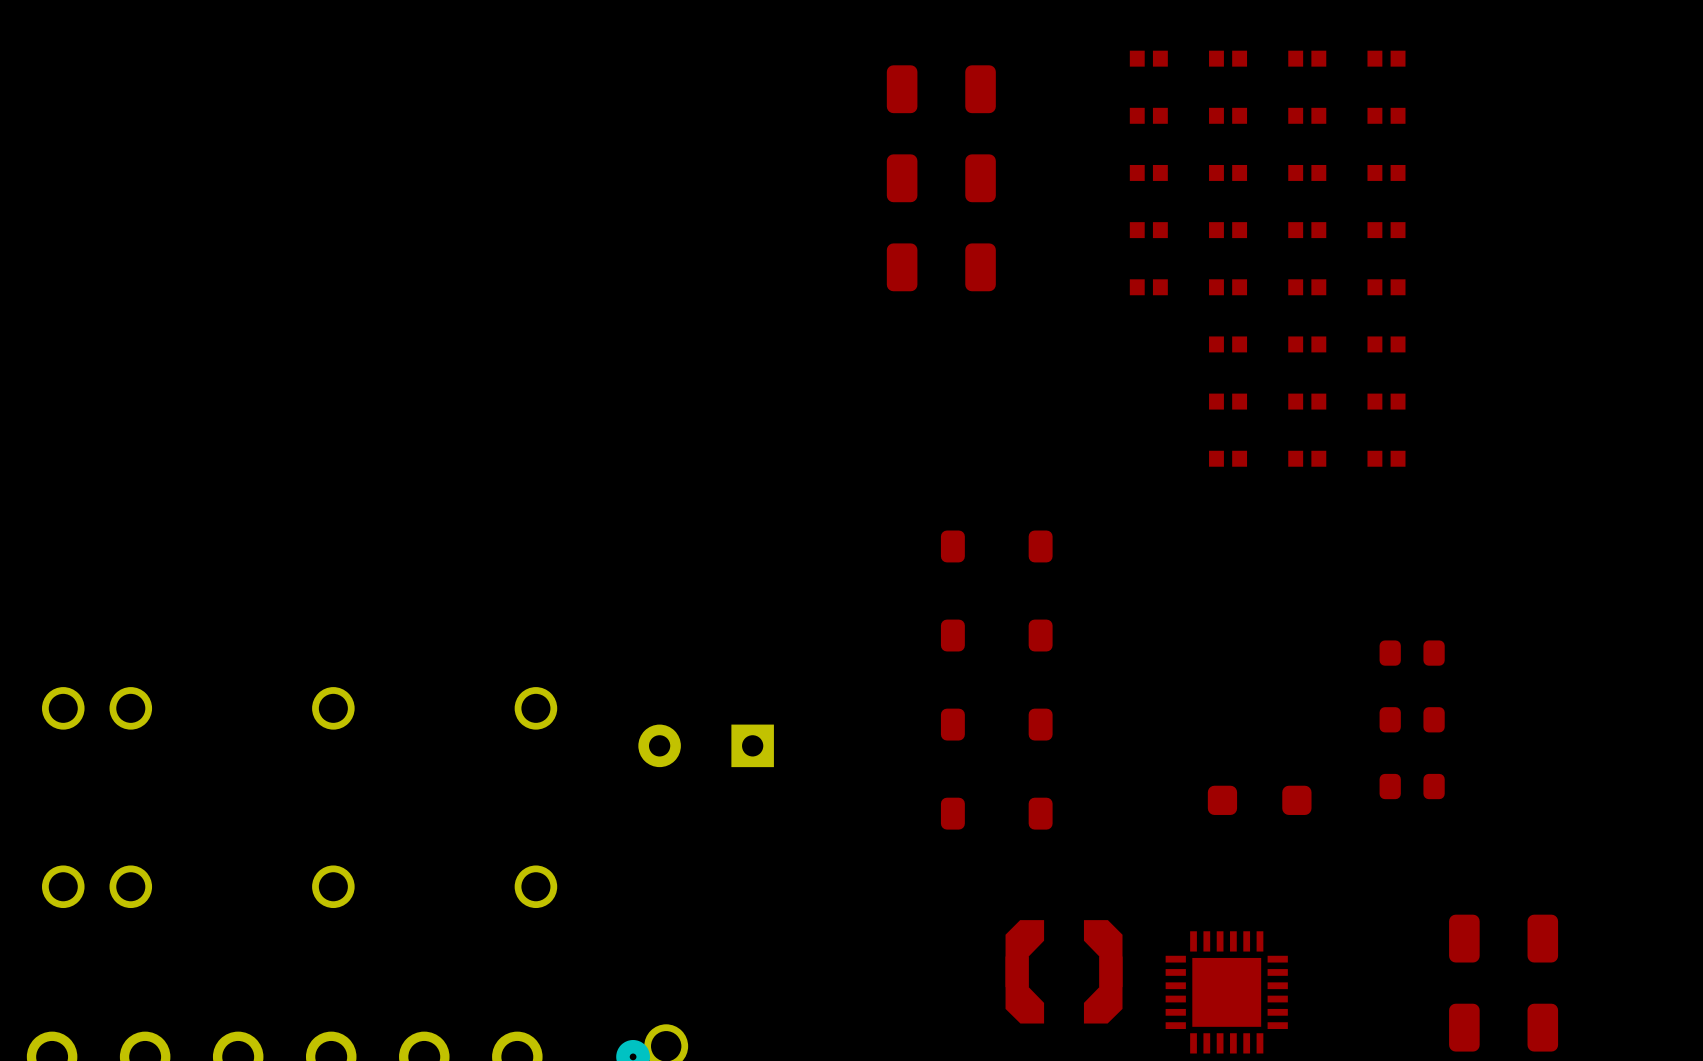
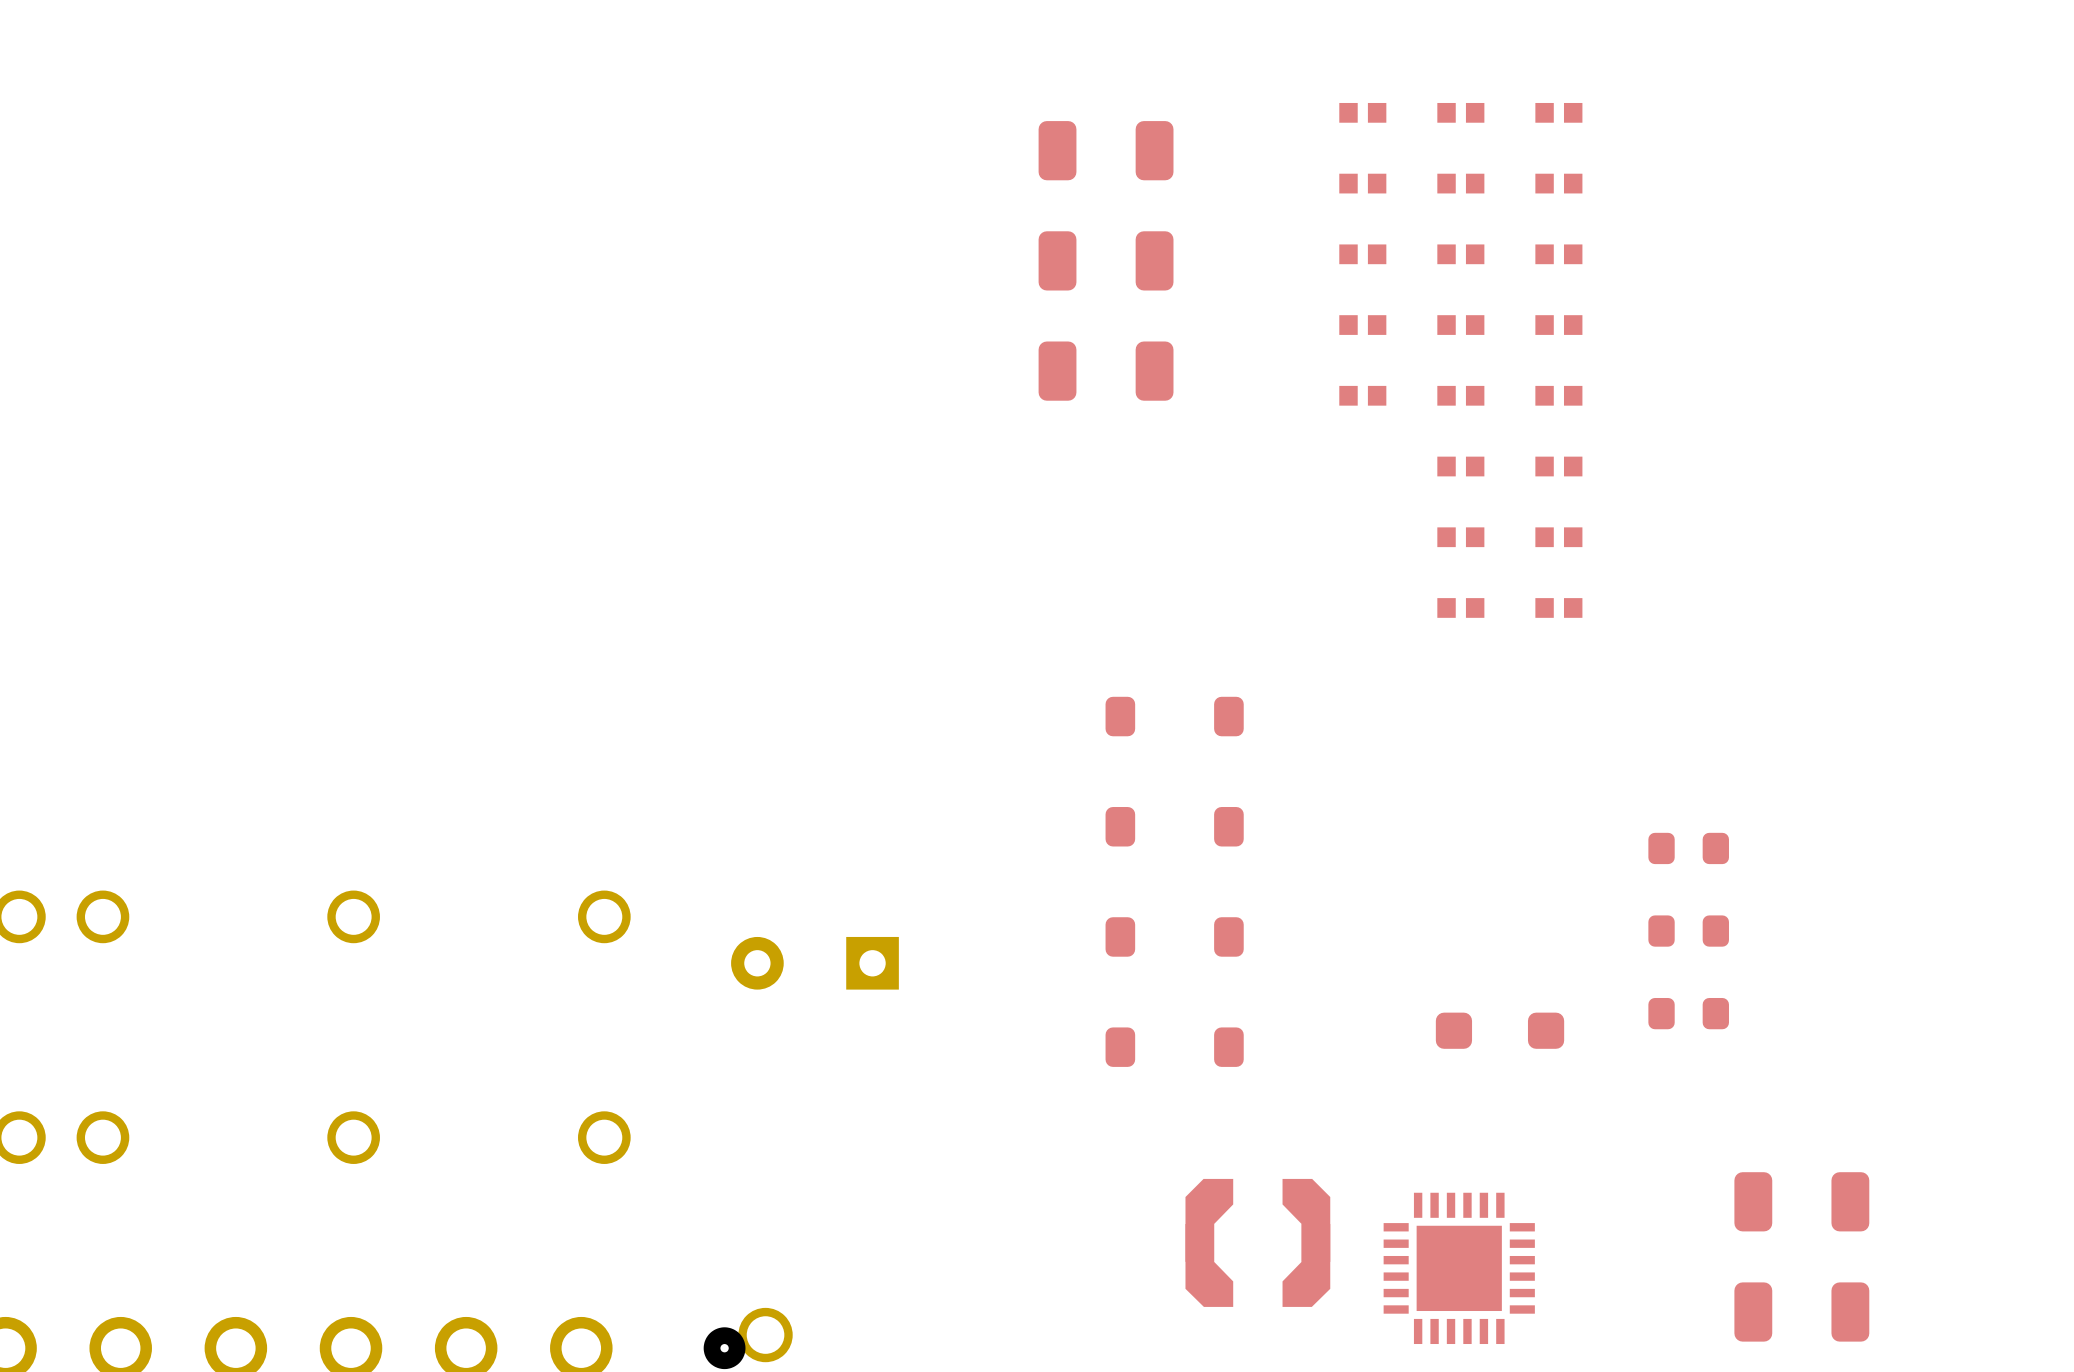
part: (1386, 58) -> none
part: (1386, 115) -> none
part: (1386, 172) -> none
part: (1386, 230) -> none
part: (1386, 287) -> none
part: (1386, 344) -> none
part: (1386, 401) -> none
part: (1386, 458) -> none

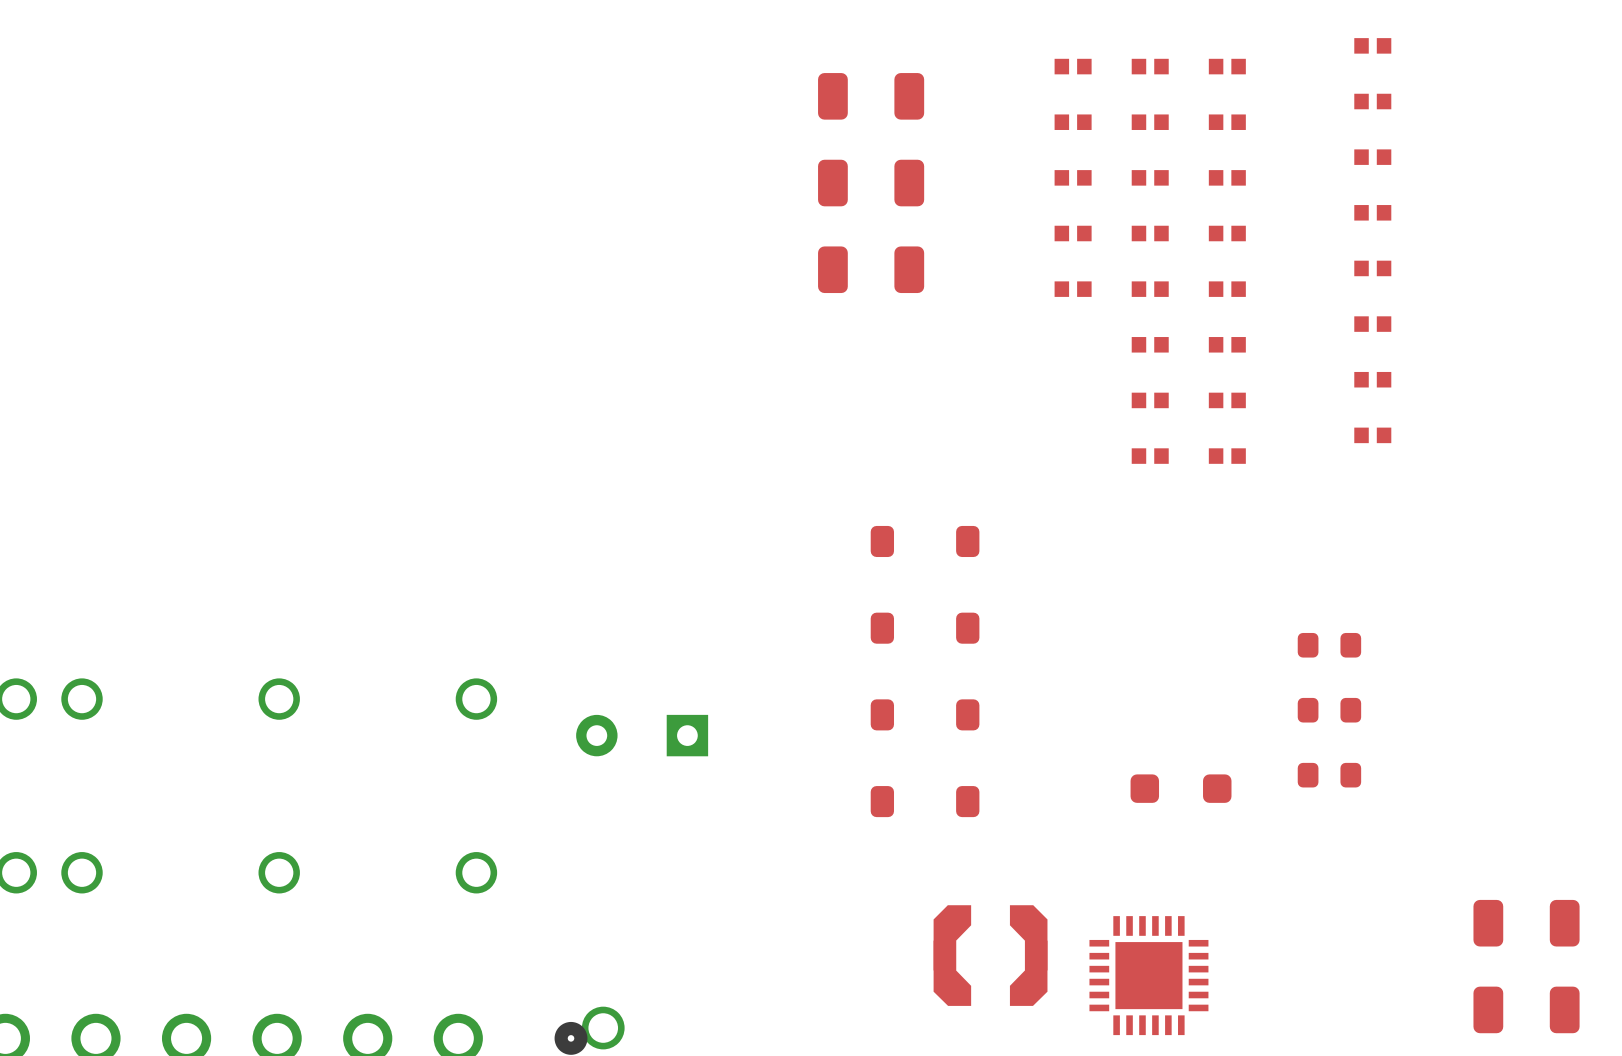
part: none -> (1372, 45)
part: none -> (1372, 101)
part: none -> (1372, 157)
part: none -> (1372, 212)
part: none -> (1372, 268)
part: none -> (1372, 324)
part: none -> (1372, 379)
part: none -> (1372, 435)
part: (1801, 1201) -> none
part: none -> (1526, 923)
part: (1801, 1312) -> none
part: none -> (1526, 1009)

